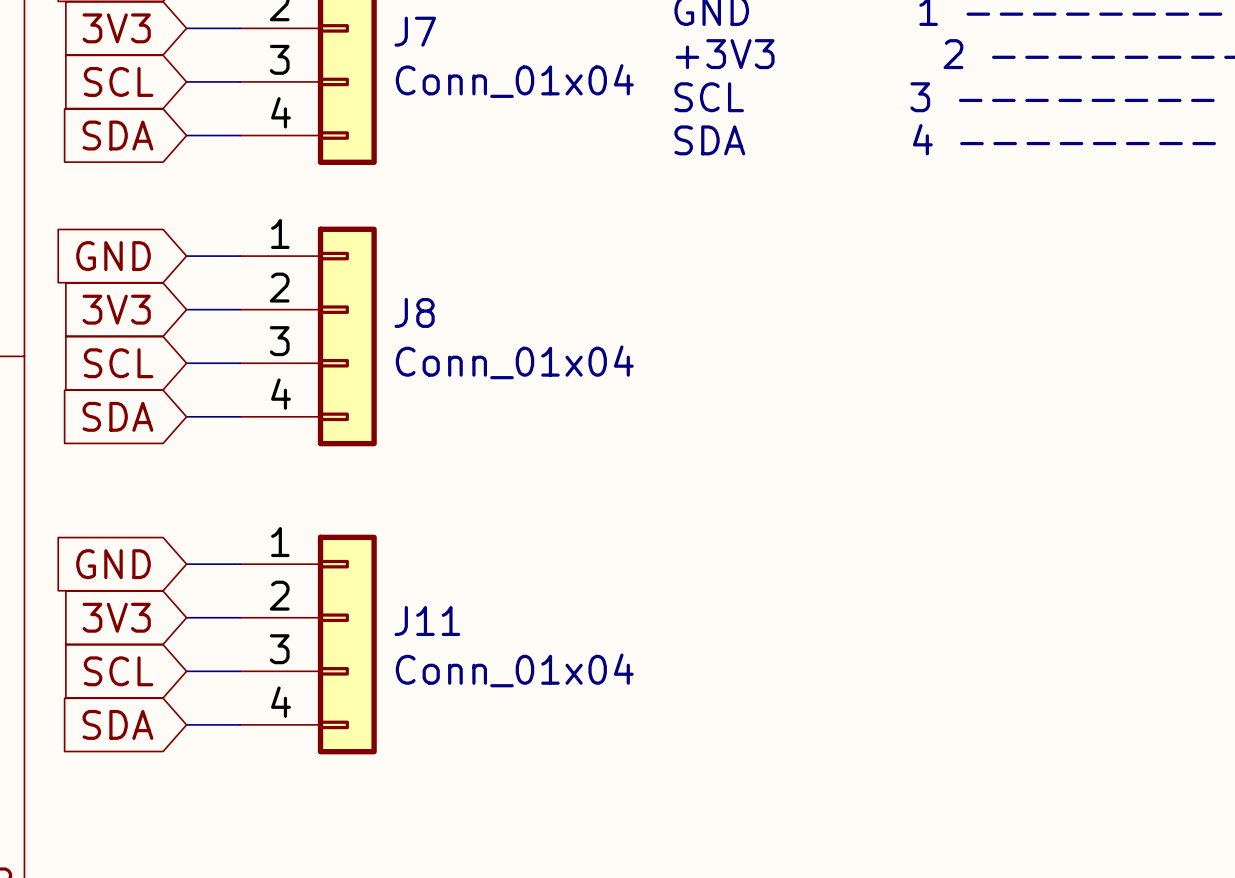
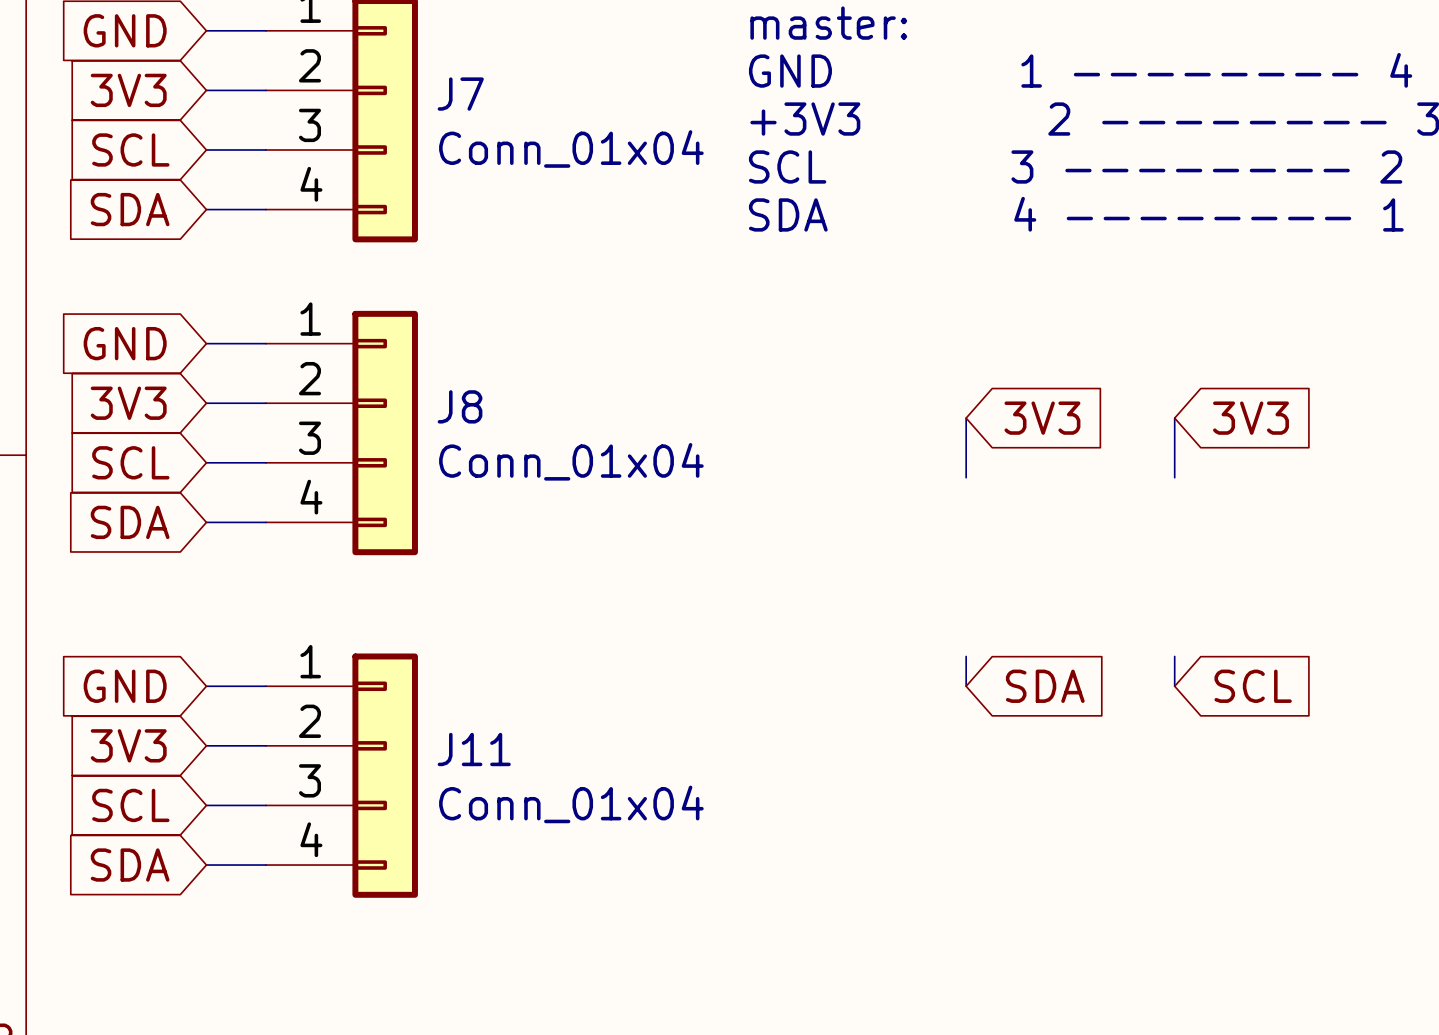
wire: none -> (966, 418) (966, 477)
global label: none -> 3V3 (1042, 418)
wire: none -> (1174, 418) (1174, 477)
global label: none -> 3V3 (1251, 418)
wire: none -> (966, 656) (966, 686)
wire: none -> (1174, 656) (1174, 686)
global label: none -> SDA (1045, 686)
global label: none -> SCL (1253, 686)

